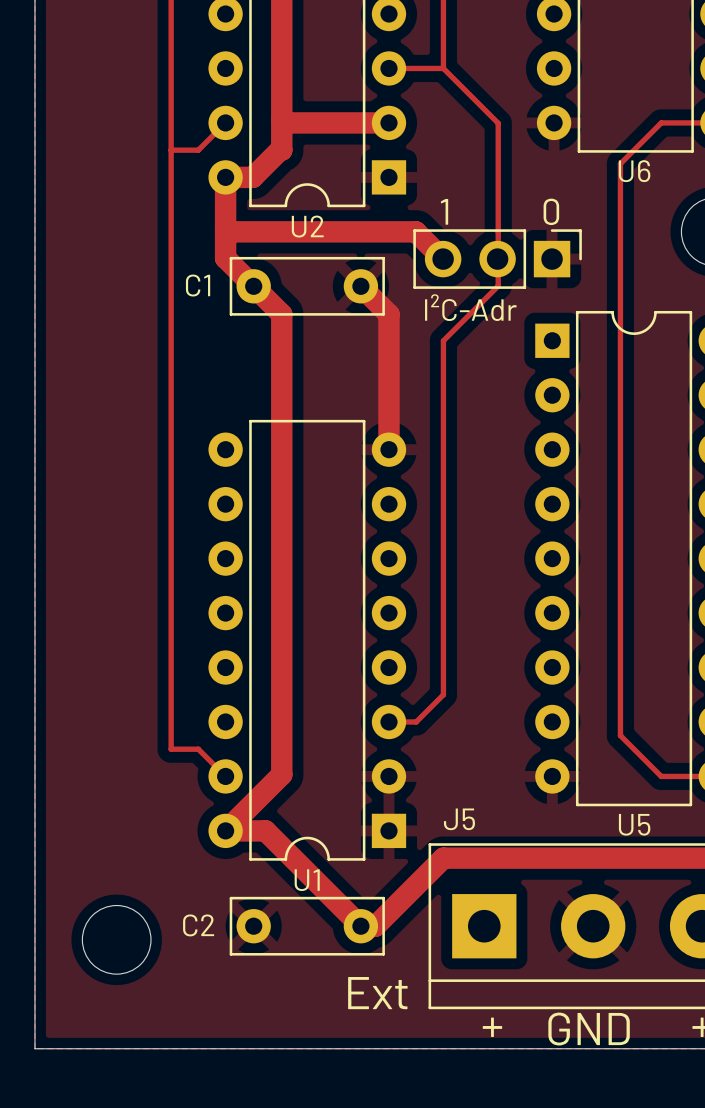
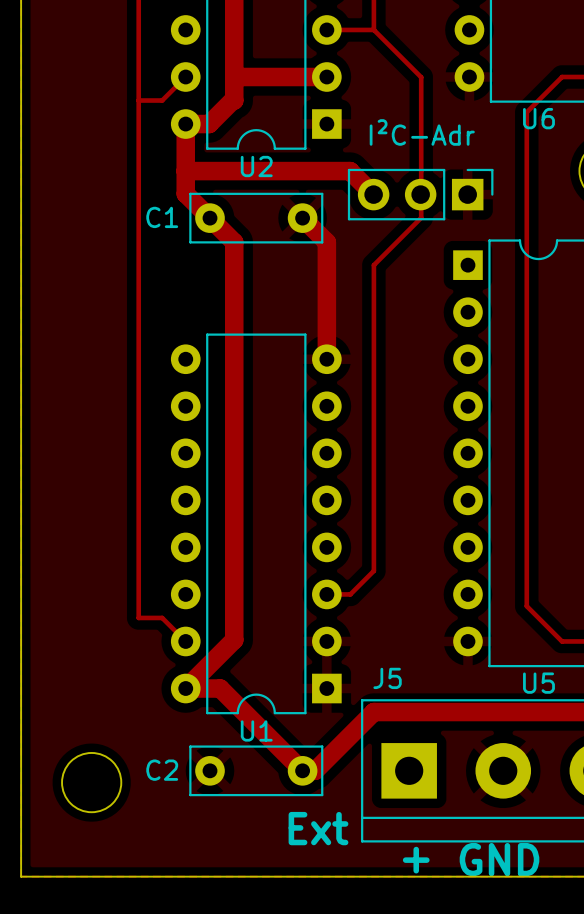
text: 1 (444, 211) -> none
text: 0 (551, 211) -> none
part value position: I²C-Adr (470, 307) -> I²C-Adr (422, 132)

